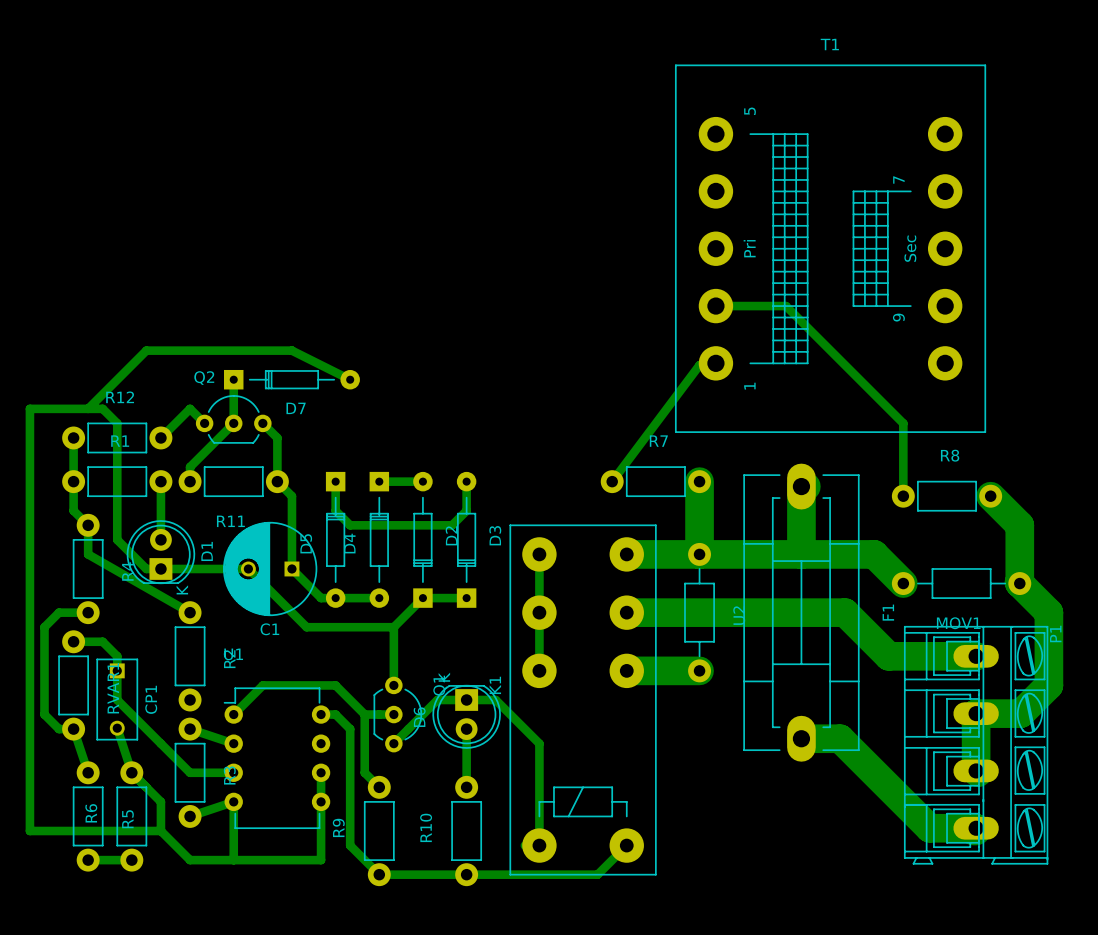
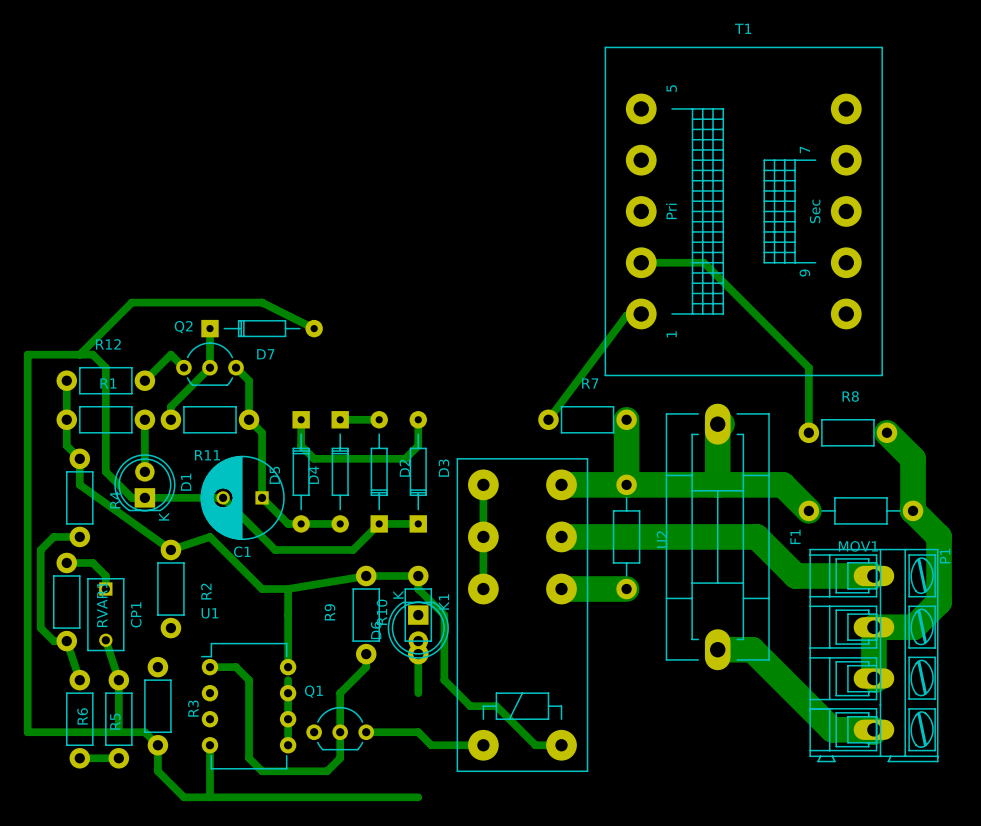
bottom track: (88, 554) (190, 612) -> (79, 484) (170, 549) (209, 536) (262, 589) (288, 589)
bottom track: (393, 627) (393, 685) -> none
R2 position: (190, 656) -> (170, 589)
bottom track: (117, 670) (117, 699) (190, 772) (233, 772) -> none
bottom track: none -> (288, 589) (288, 667)
bottom track: (233, 714) (262, 685) (335, 685) (364, 714) -> none
bottom track: (321, 714) (335, 714) (350, 729) (350, 845) (379, 874) (597, 874) (626, 845) -> (288, 589) (366, 576) (418, 576) (418, 589) (444, 615) (444, 680) (470, 706) (496, 706) (535, 745) (561, 745)
bottom track: (364, 714) (393, 714) -> none
bottom track: (364, 714) (364, 772) (379, 787) -> none
Q1 rotation: 0° (397, 714) -> 90° counterclockwise (340, 728)
Q1 position: (397, 714) -> (340, 728)
bottom track: (190, 729) (233, 743) -> none
bottom track: (393, 743) (437, 699) (495, 699) (539, 743) (539, 845) -> none
bottom track: none -> (366, 654) (366, 667) (340, 693) (340, 758) (327, 771) (262, 771) (249, 758) (249, 680) (236, 667) (209, 667)
U1 position: (276, 758) -> (248, 706)
bottom track: (131, 772) (160, 801) (160, 831) -> (118, 680) (118, 732)
R3 position: (190, 772) -> (157, 706)
bottom track: (189, 815) (233, 801) (233, 845) -> none
R9 position: (379, 831) -> (366, 615)
bottom track: none -> (366, 732) (418, 732) (431, 745) (470, 745)
R10 position: (466, 831) -> (418, 615)
bottom track: (175, 845) (190, 860) (321, 860) (321, 845) -> (157, 745) (157, 771) (183, 797) (418, 797)
bottom track: none -> (209, 758) (209, 797)

